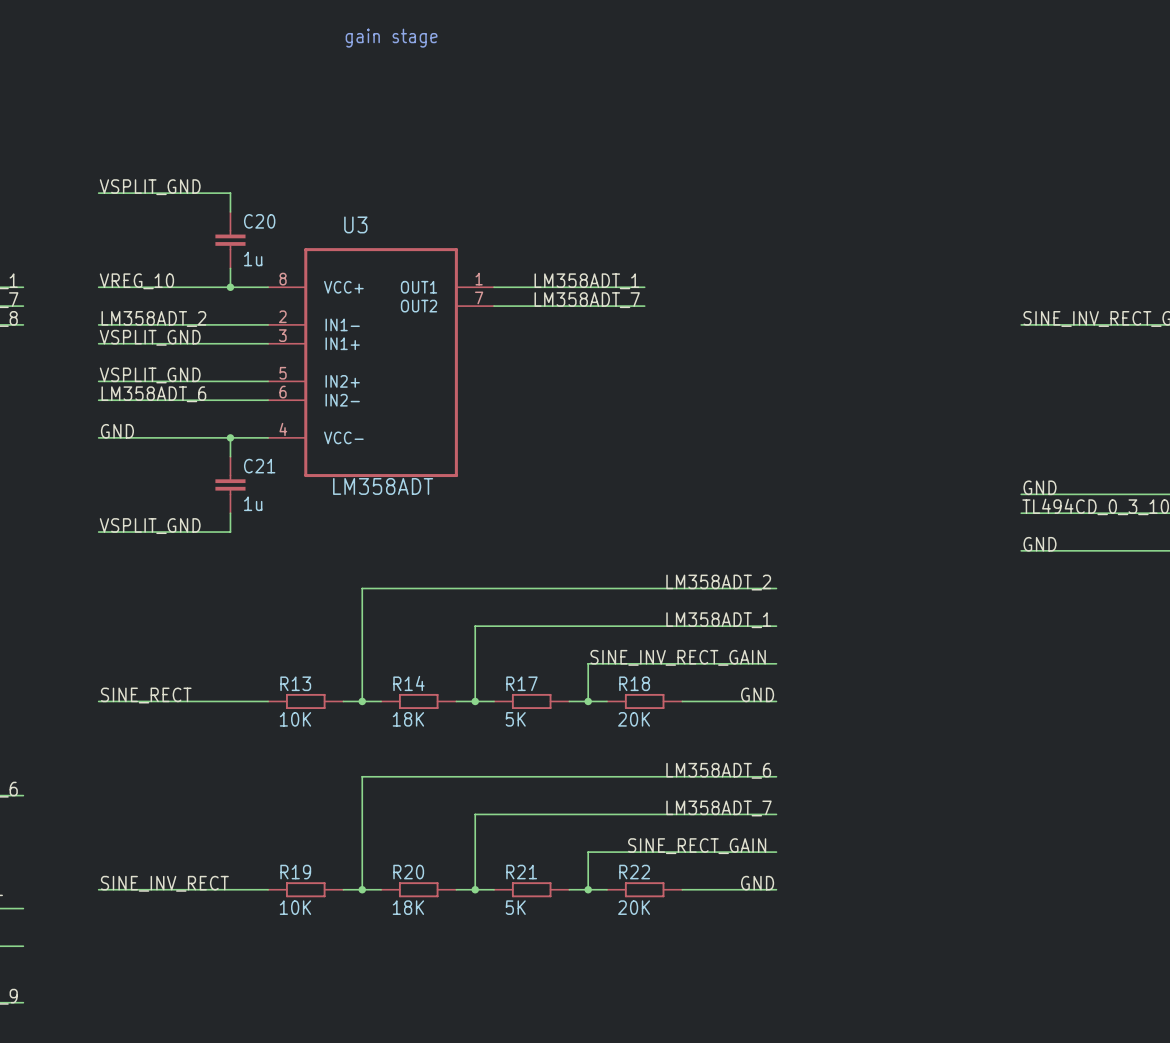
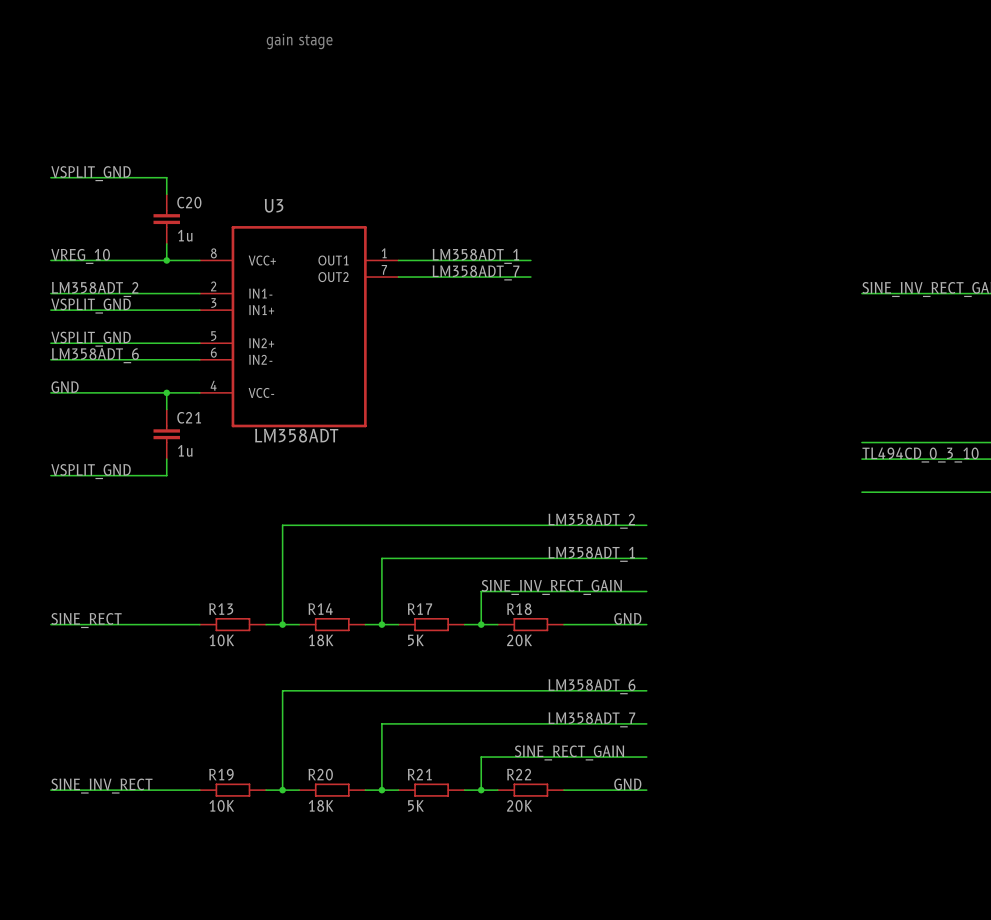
label: GND (1039, 487) -> none
label: GND (1039, 544) -> none

